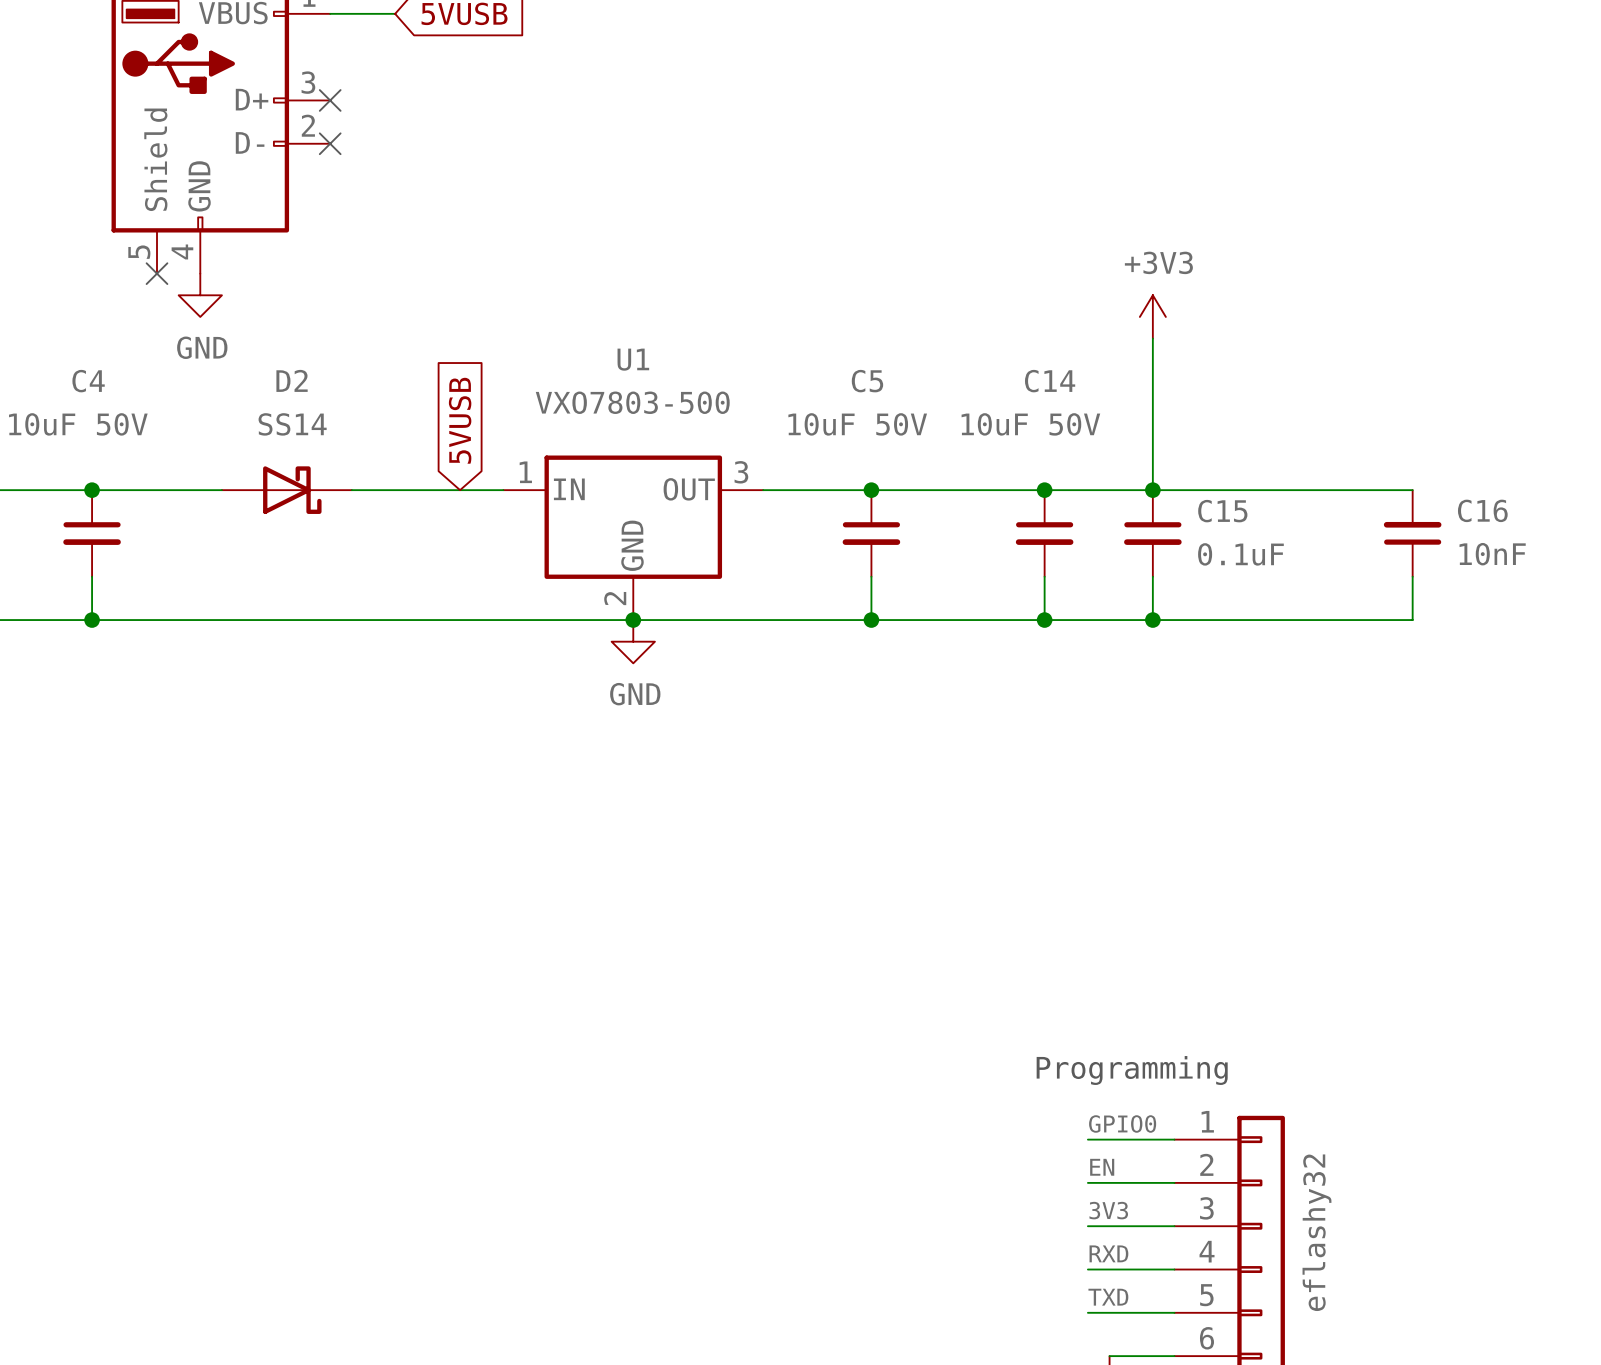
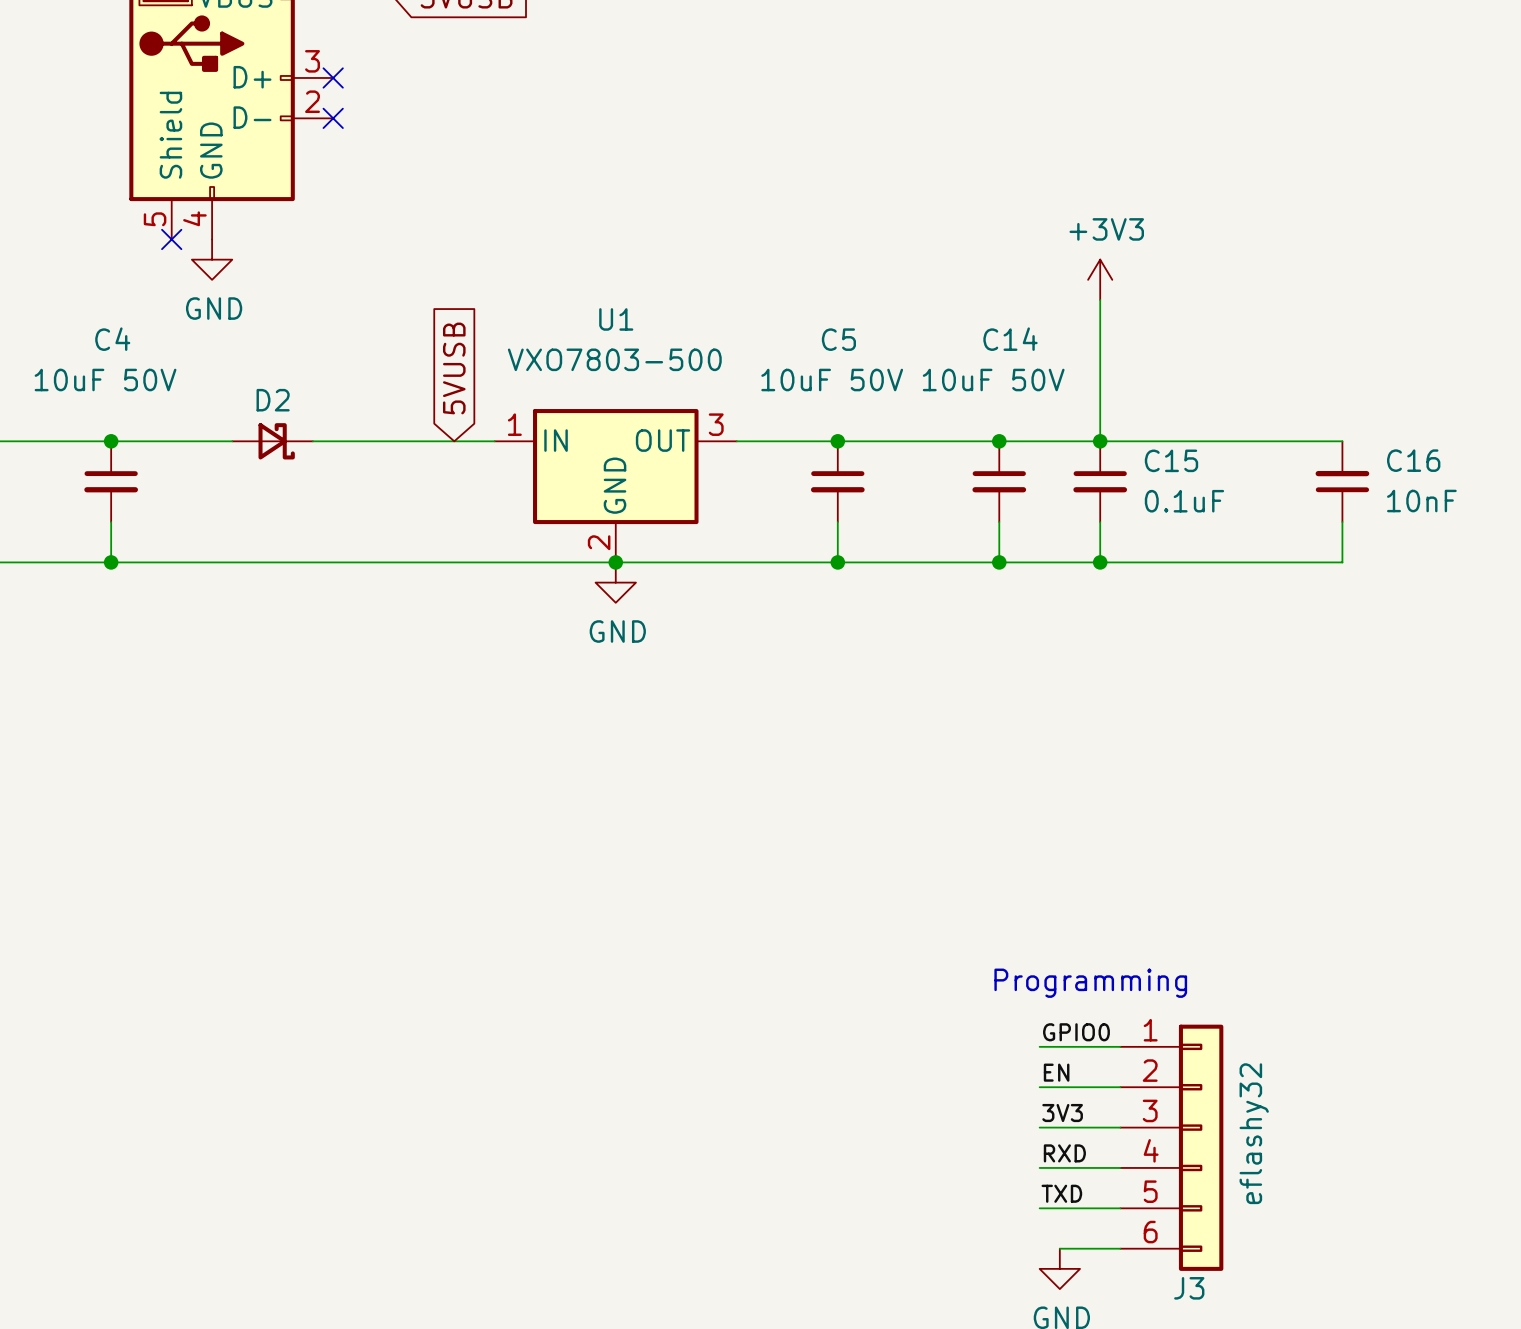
D2 name position: D2 (292, 380) -> D2 (273, 400)
D2 value: SS14 (292, 424) -> none
D2 symbol: [221, 466, 352, 514] -> [232, 423, 314, 460]

